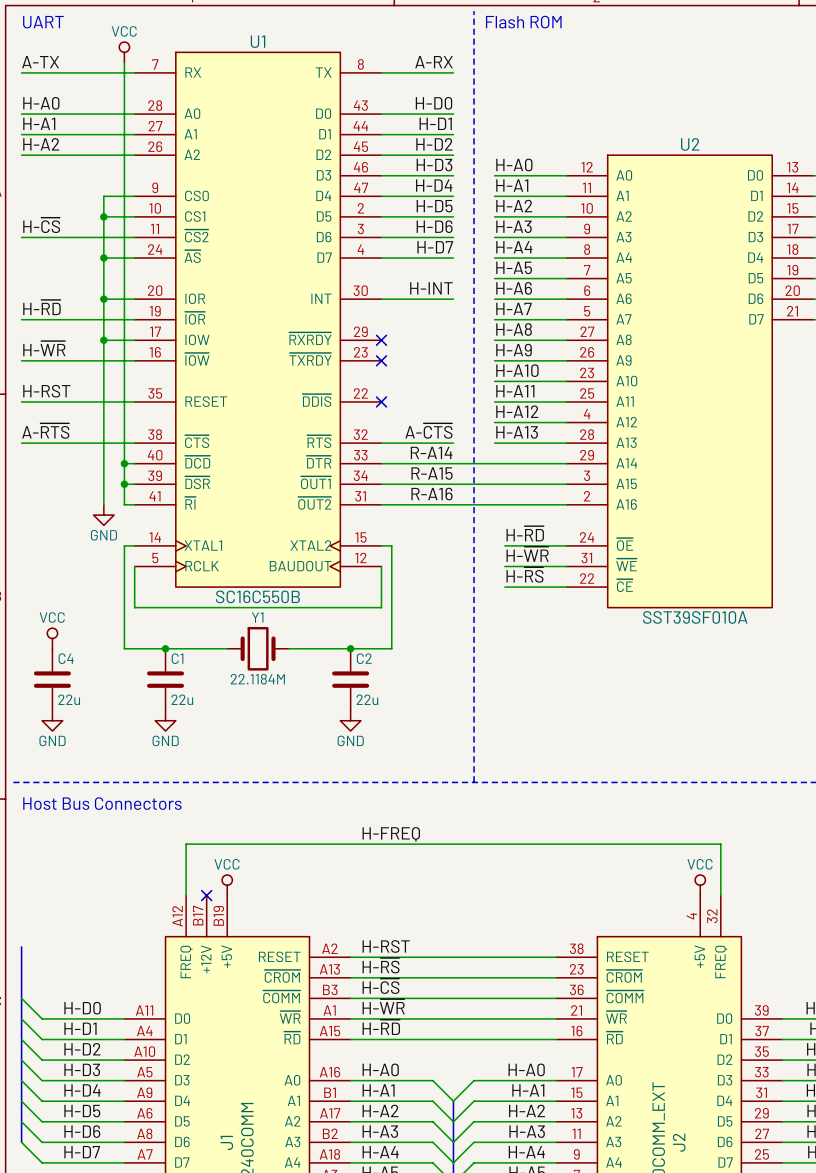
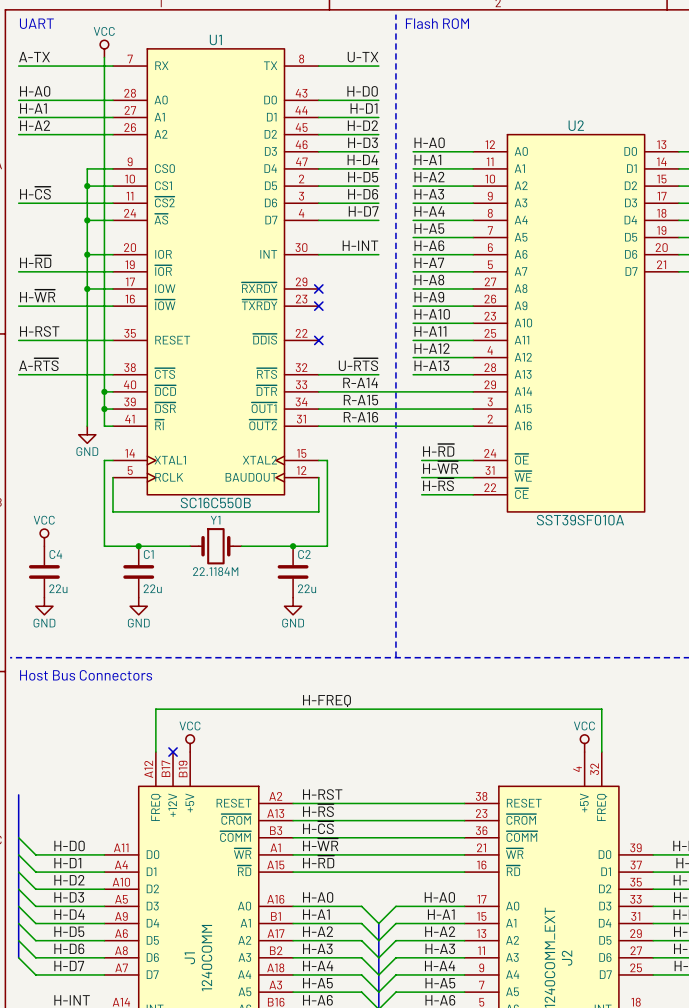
label: A-RX (434, 62) -> U-TX (363, 57)
label: A-~{CTS} (428, 431) -> U-~{RTS} (358, 364)

